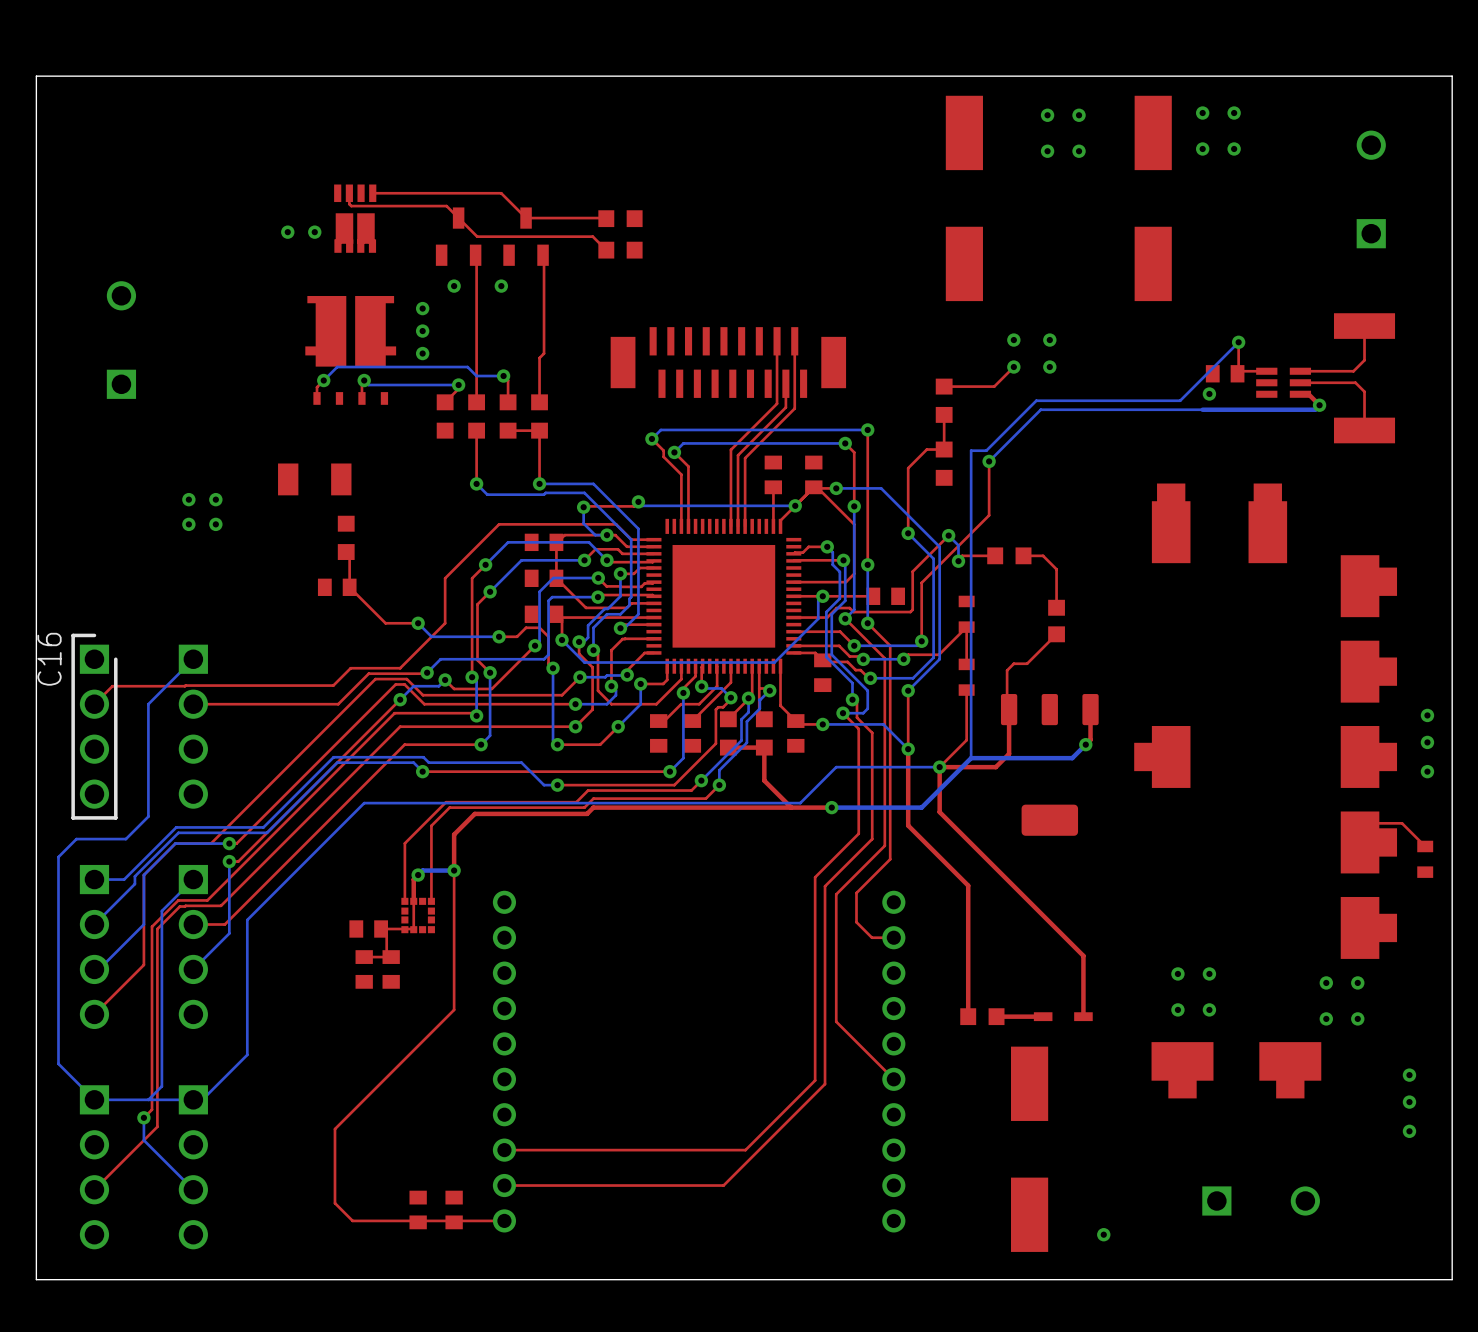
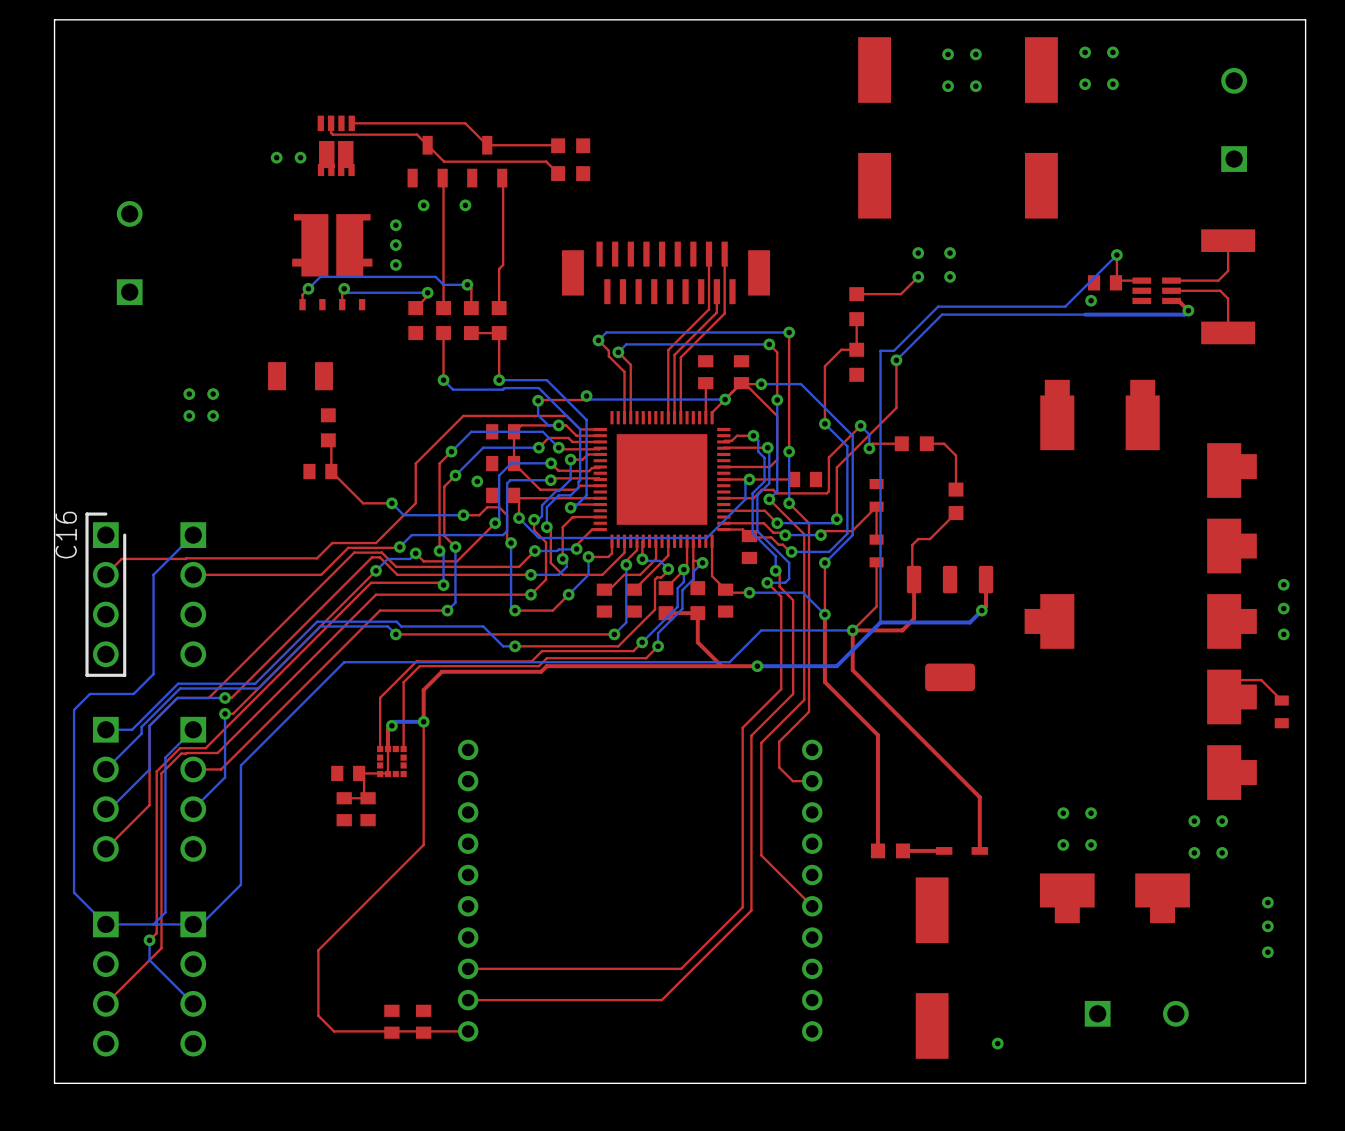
via: none -> (477, 481)

